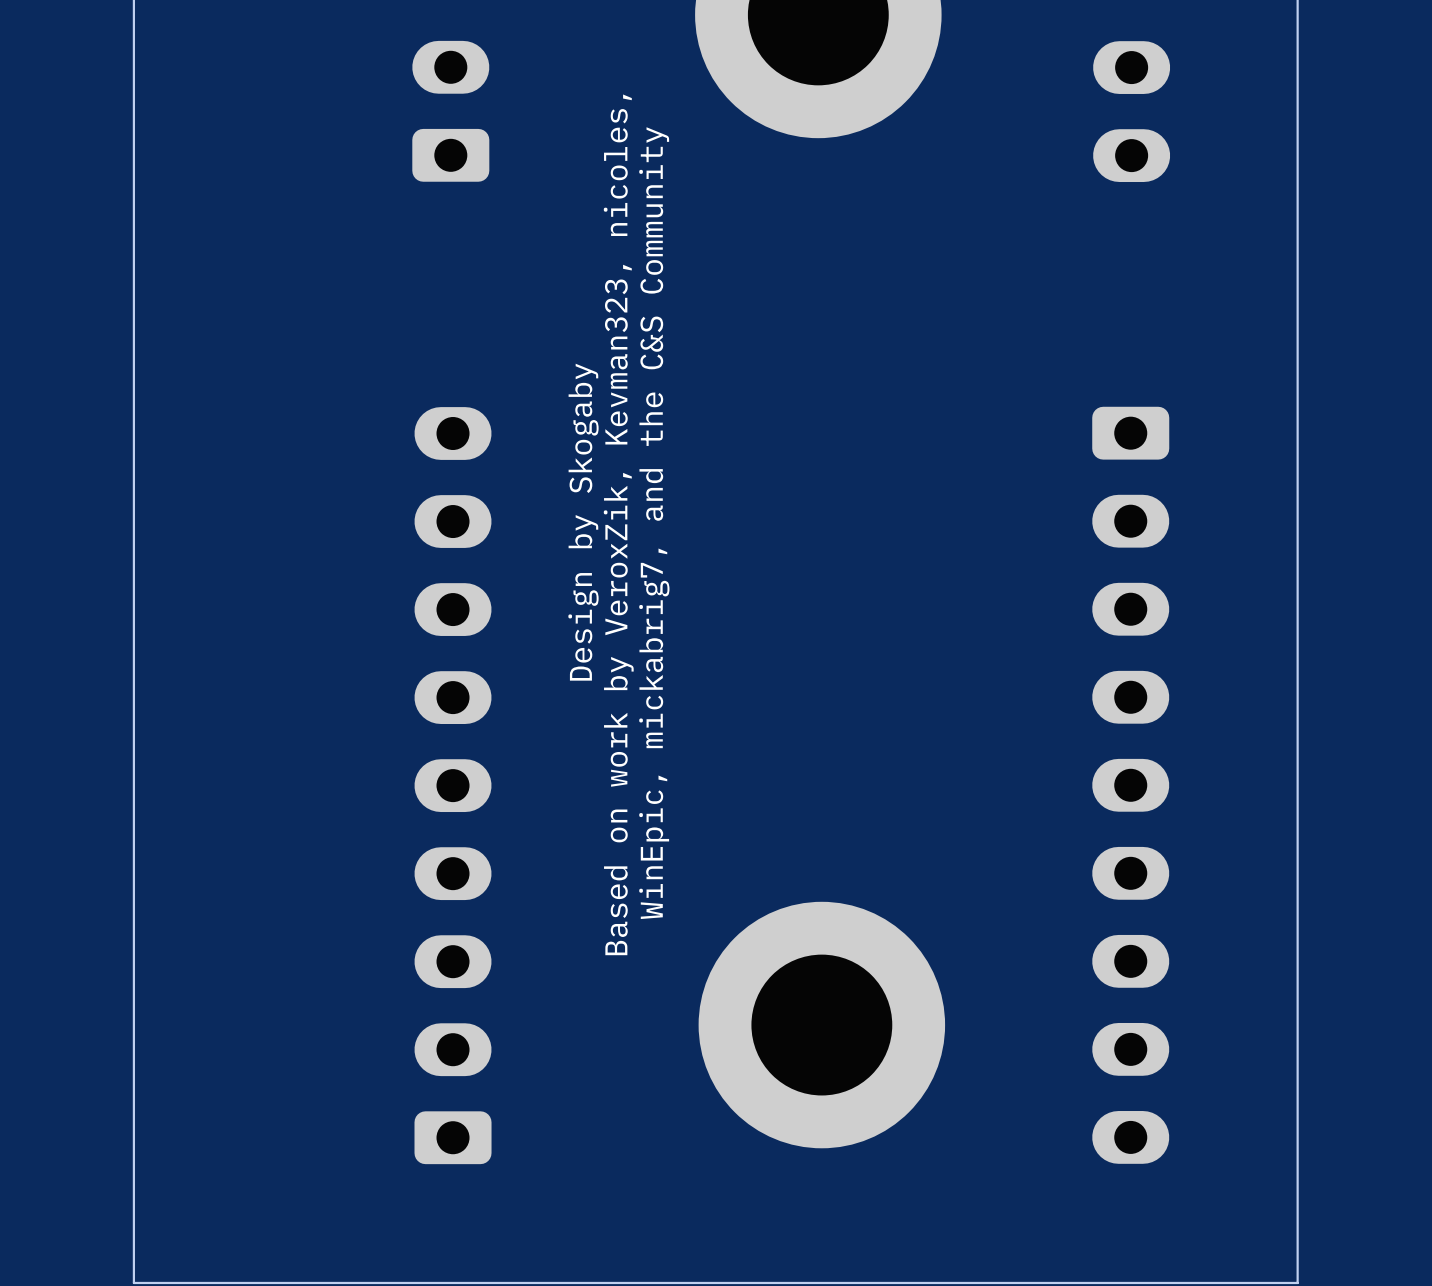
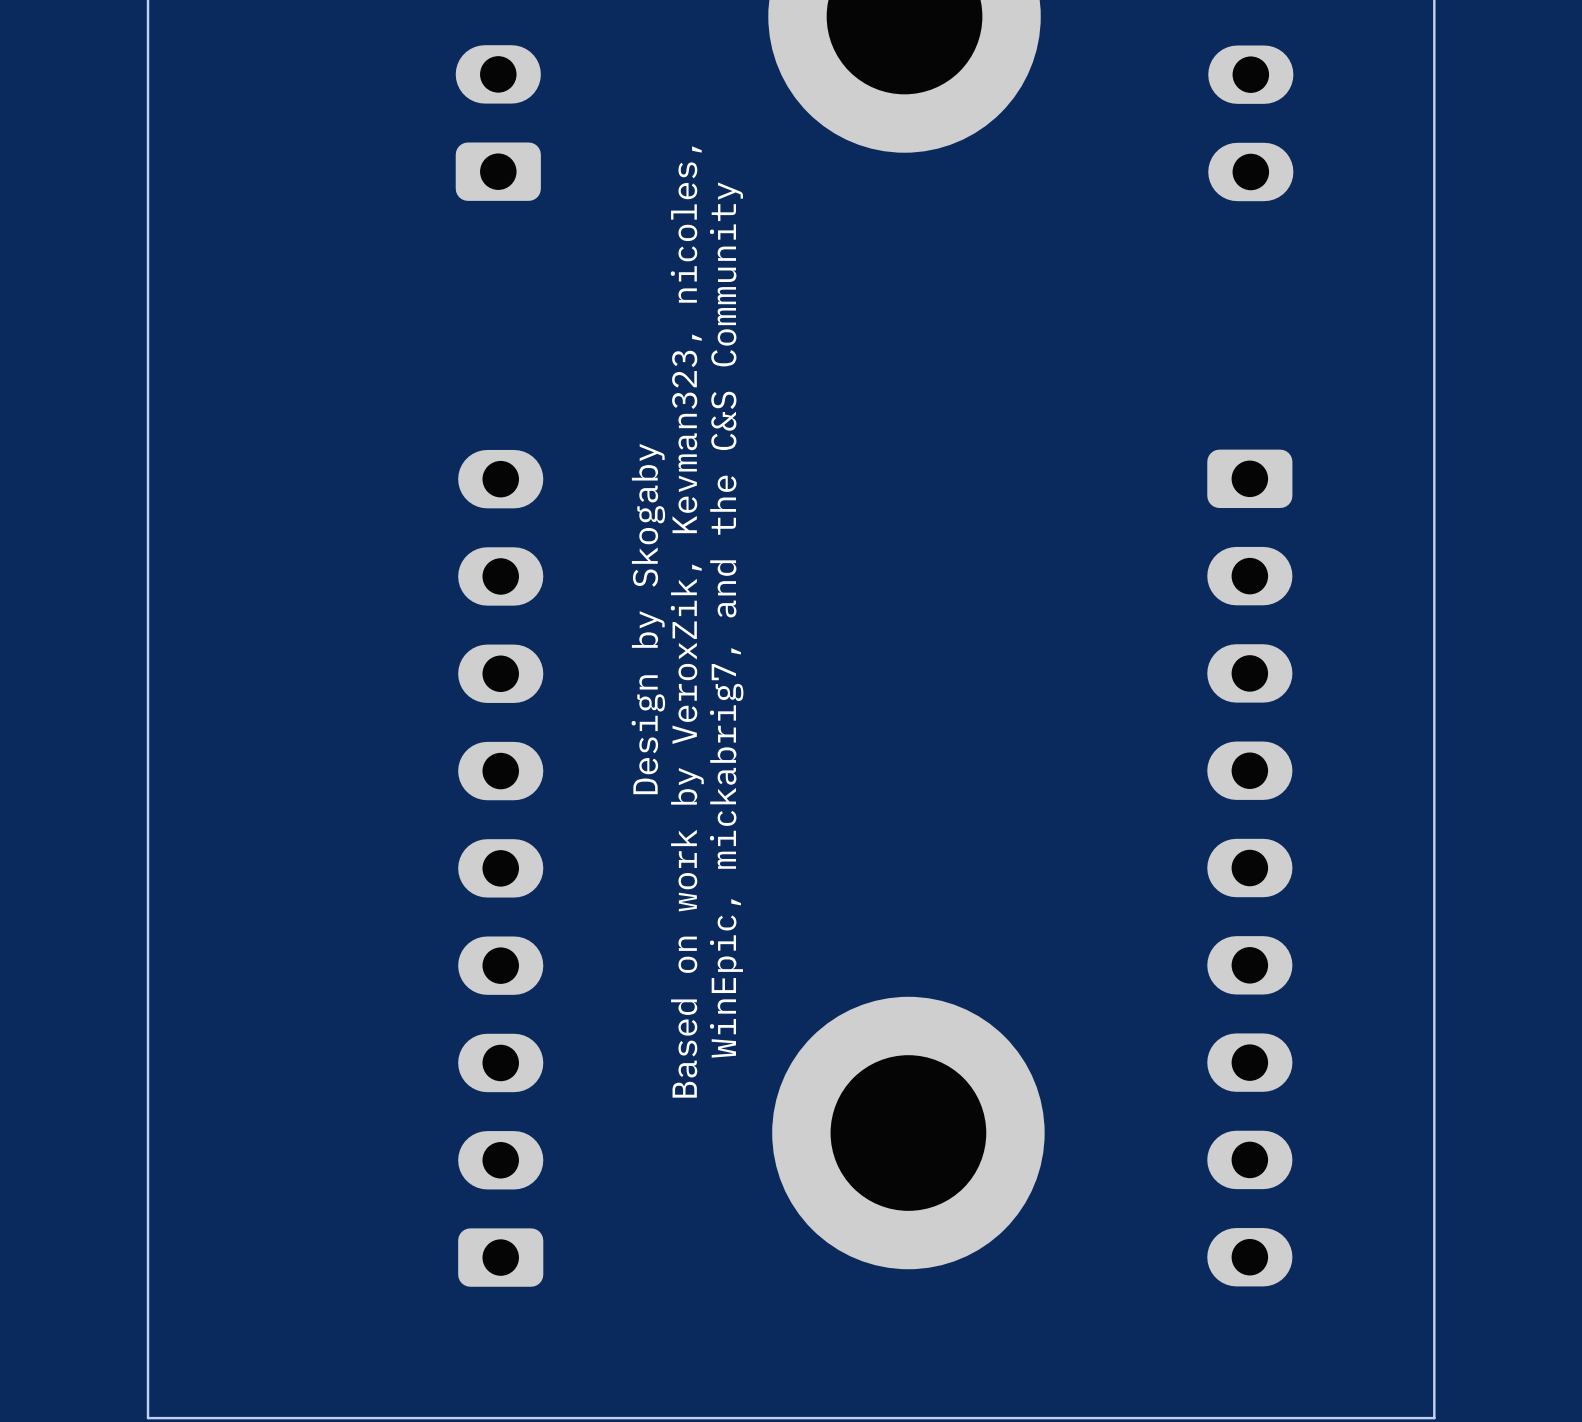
text position: Design by Skogaby (583, 522) -> Design by Skogaby (648, 619)
text position: WinEpic, mickabrig7, and the C&S Community (654, 523) -> WinEpic, mickabrig7, and the C&S Community (726, 620)
text position: Based on work by VeroxZik, Kevman323, nicoles, (618, 524) -> Based on work by VeroxZik, Kevman323, nicoles, (687, 621)

